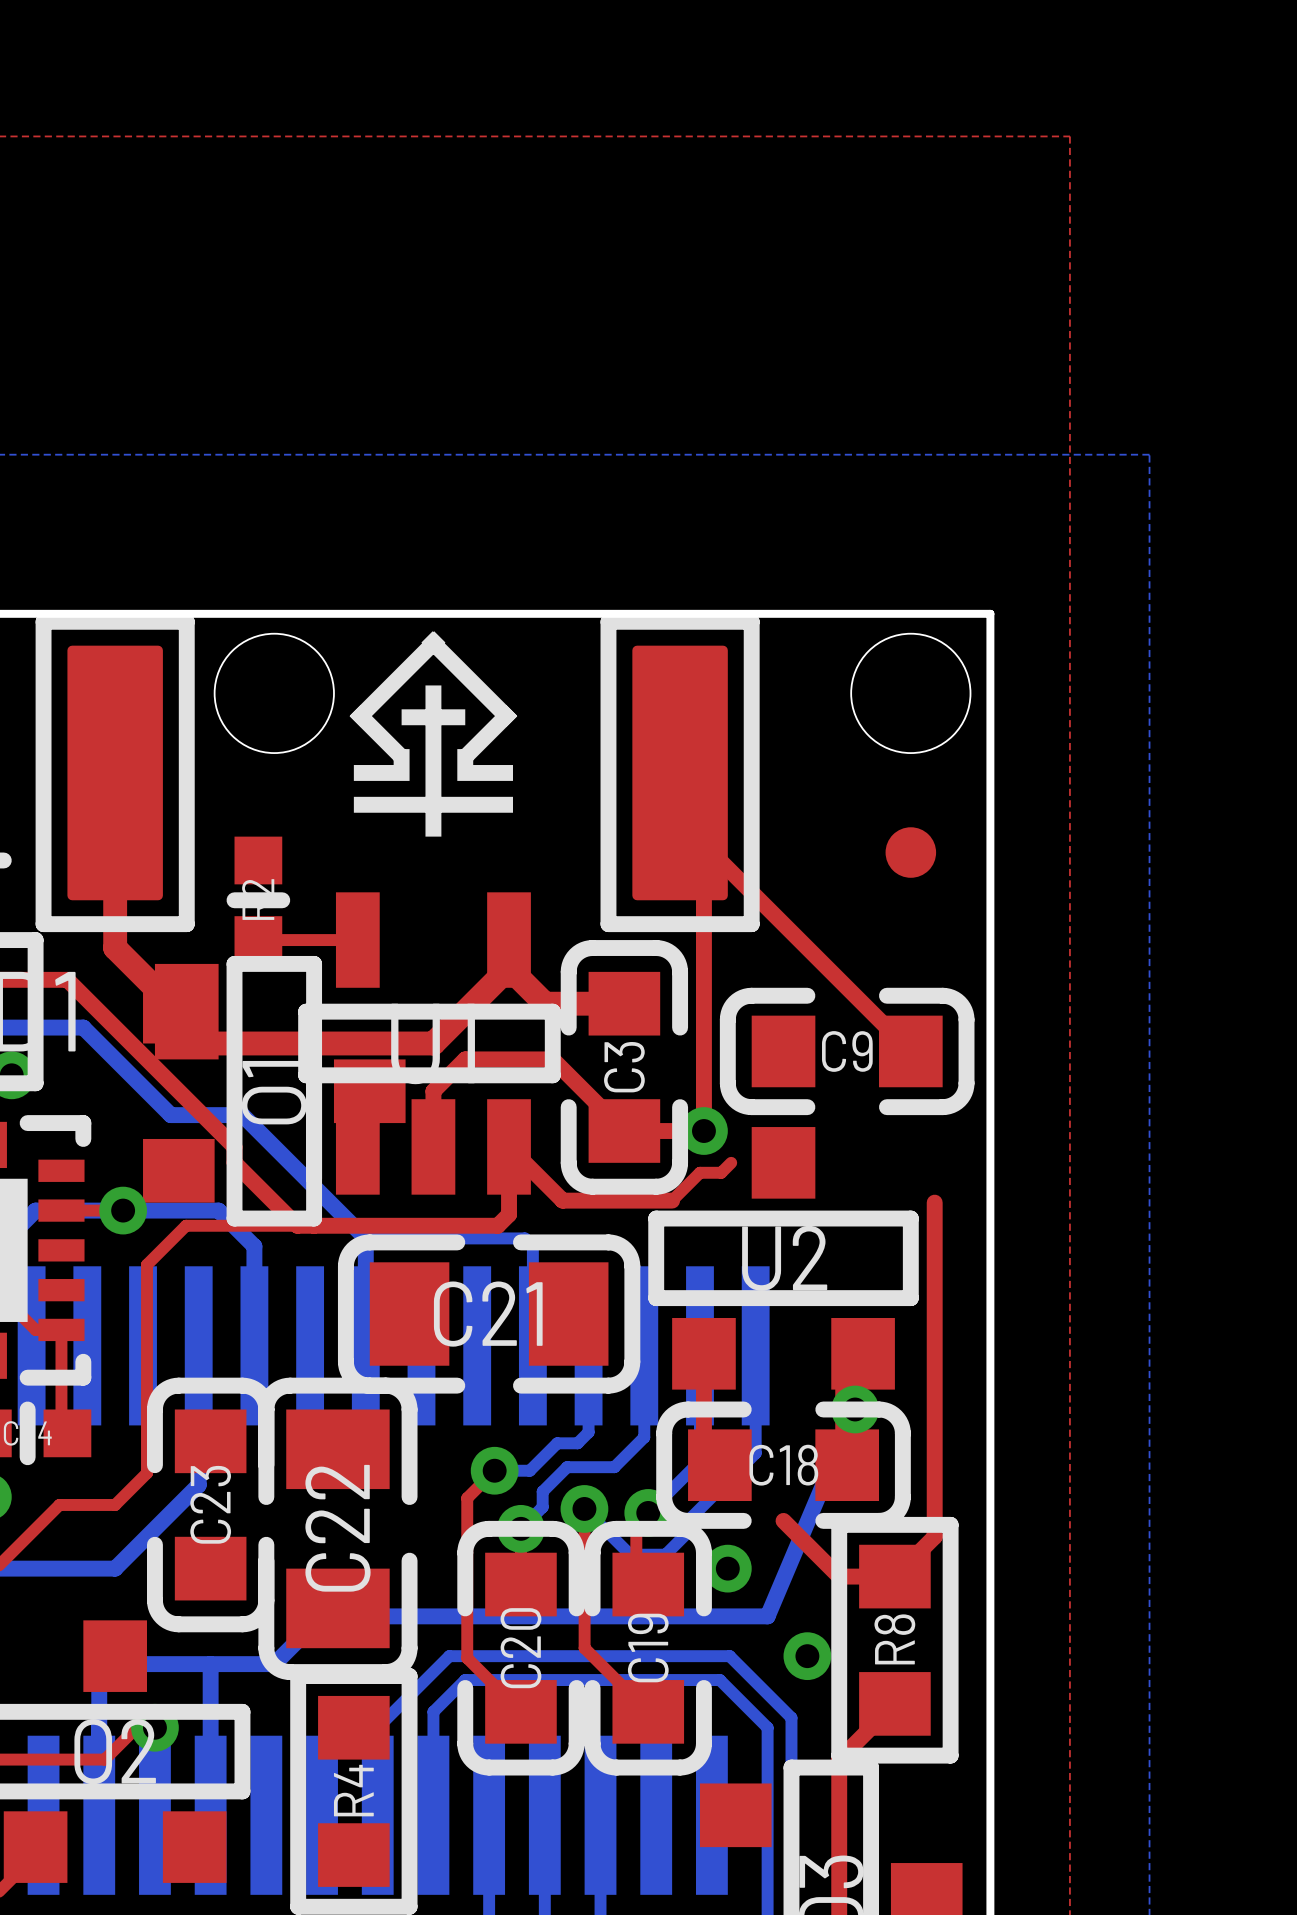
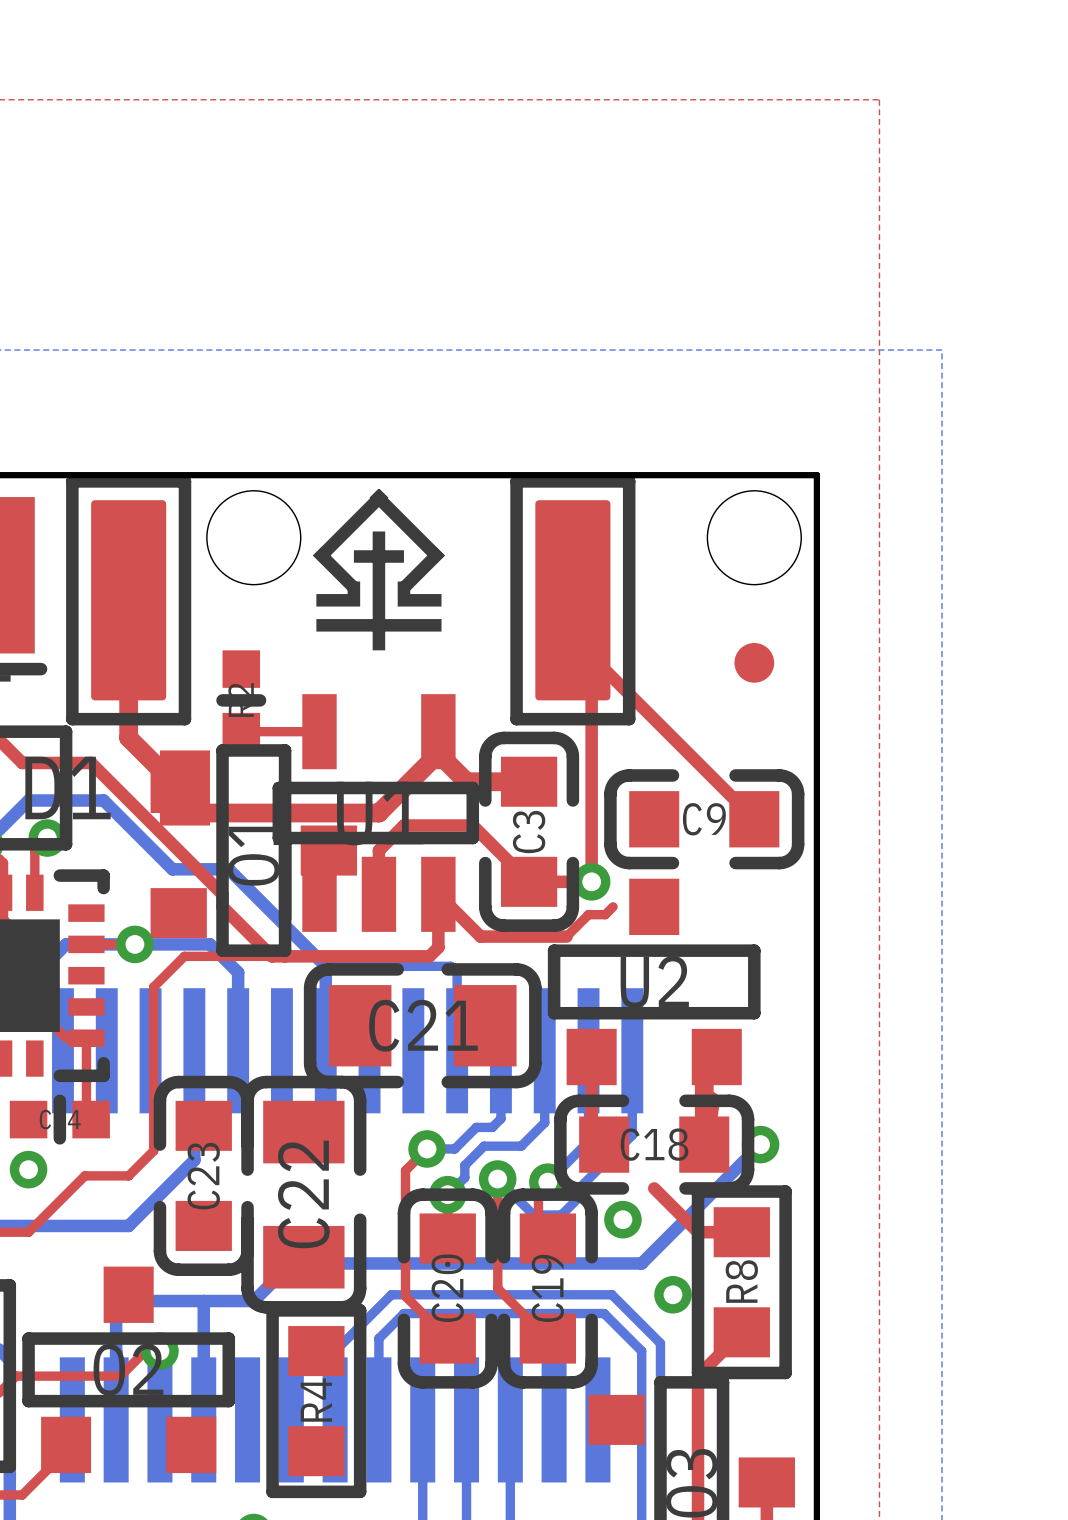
top track: (934, 1202) (934, 1536) (894, 1576) -> none
bottom track: (855, 1409) (767, 1616) -> (760, 1144) (641, 1263)
via position: (855, 1409) -> (760, 1144)
via position: (727, 1568) -> (622, 1219)

